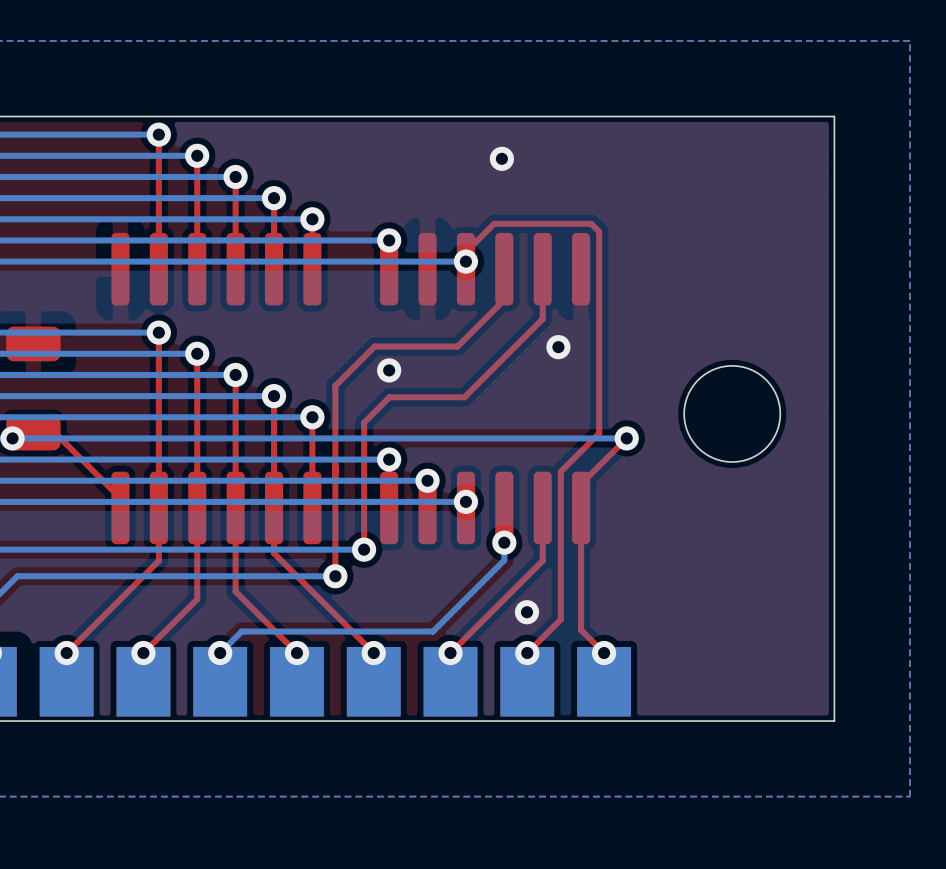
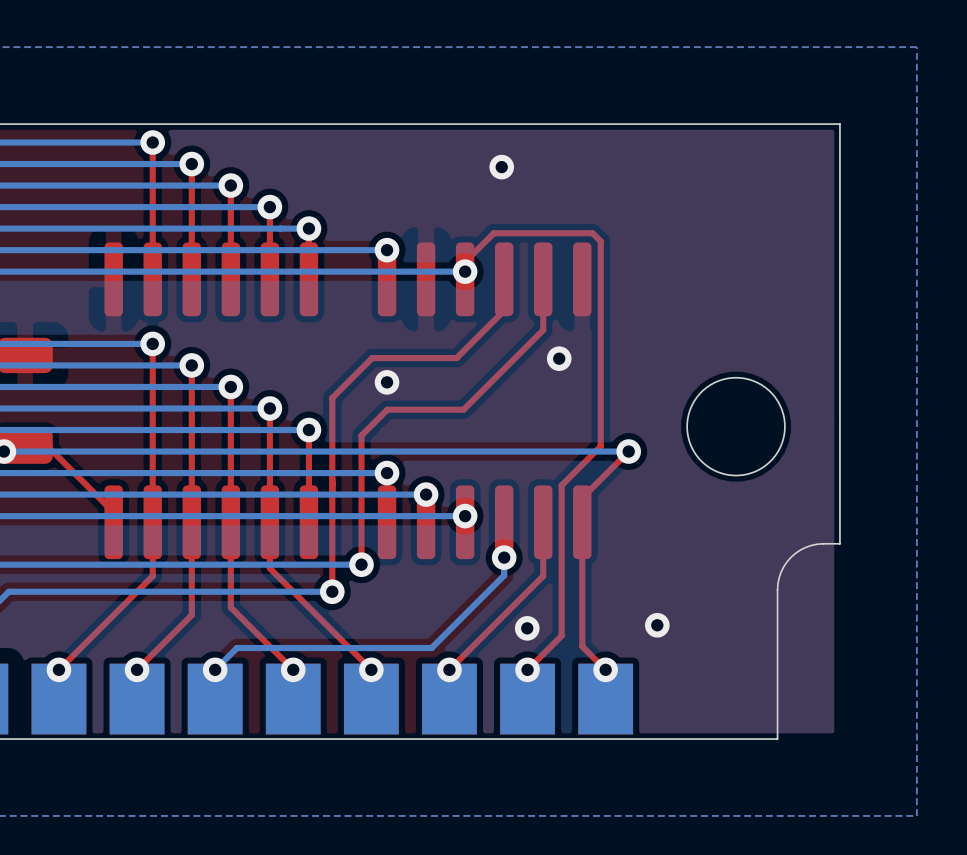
board edge: (834, 529) (834, 721) (773, 721) -> (839, 543) (817, 544) (800, 549) (787, 561) (779, 577) (777, 739)
via: none -> (657, 625)

